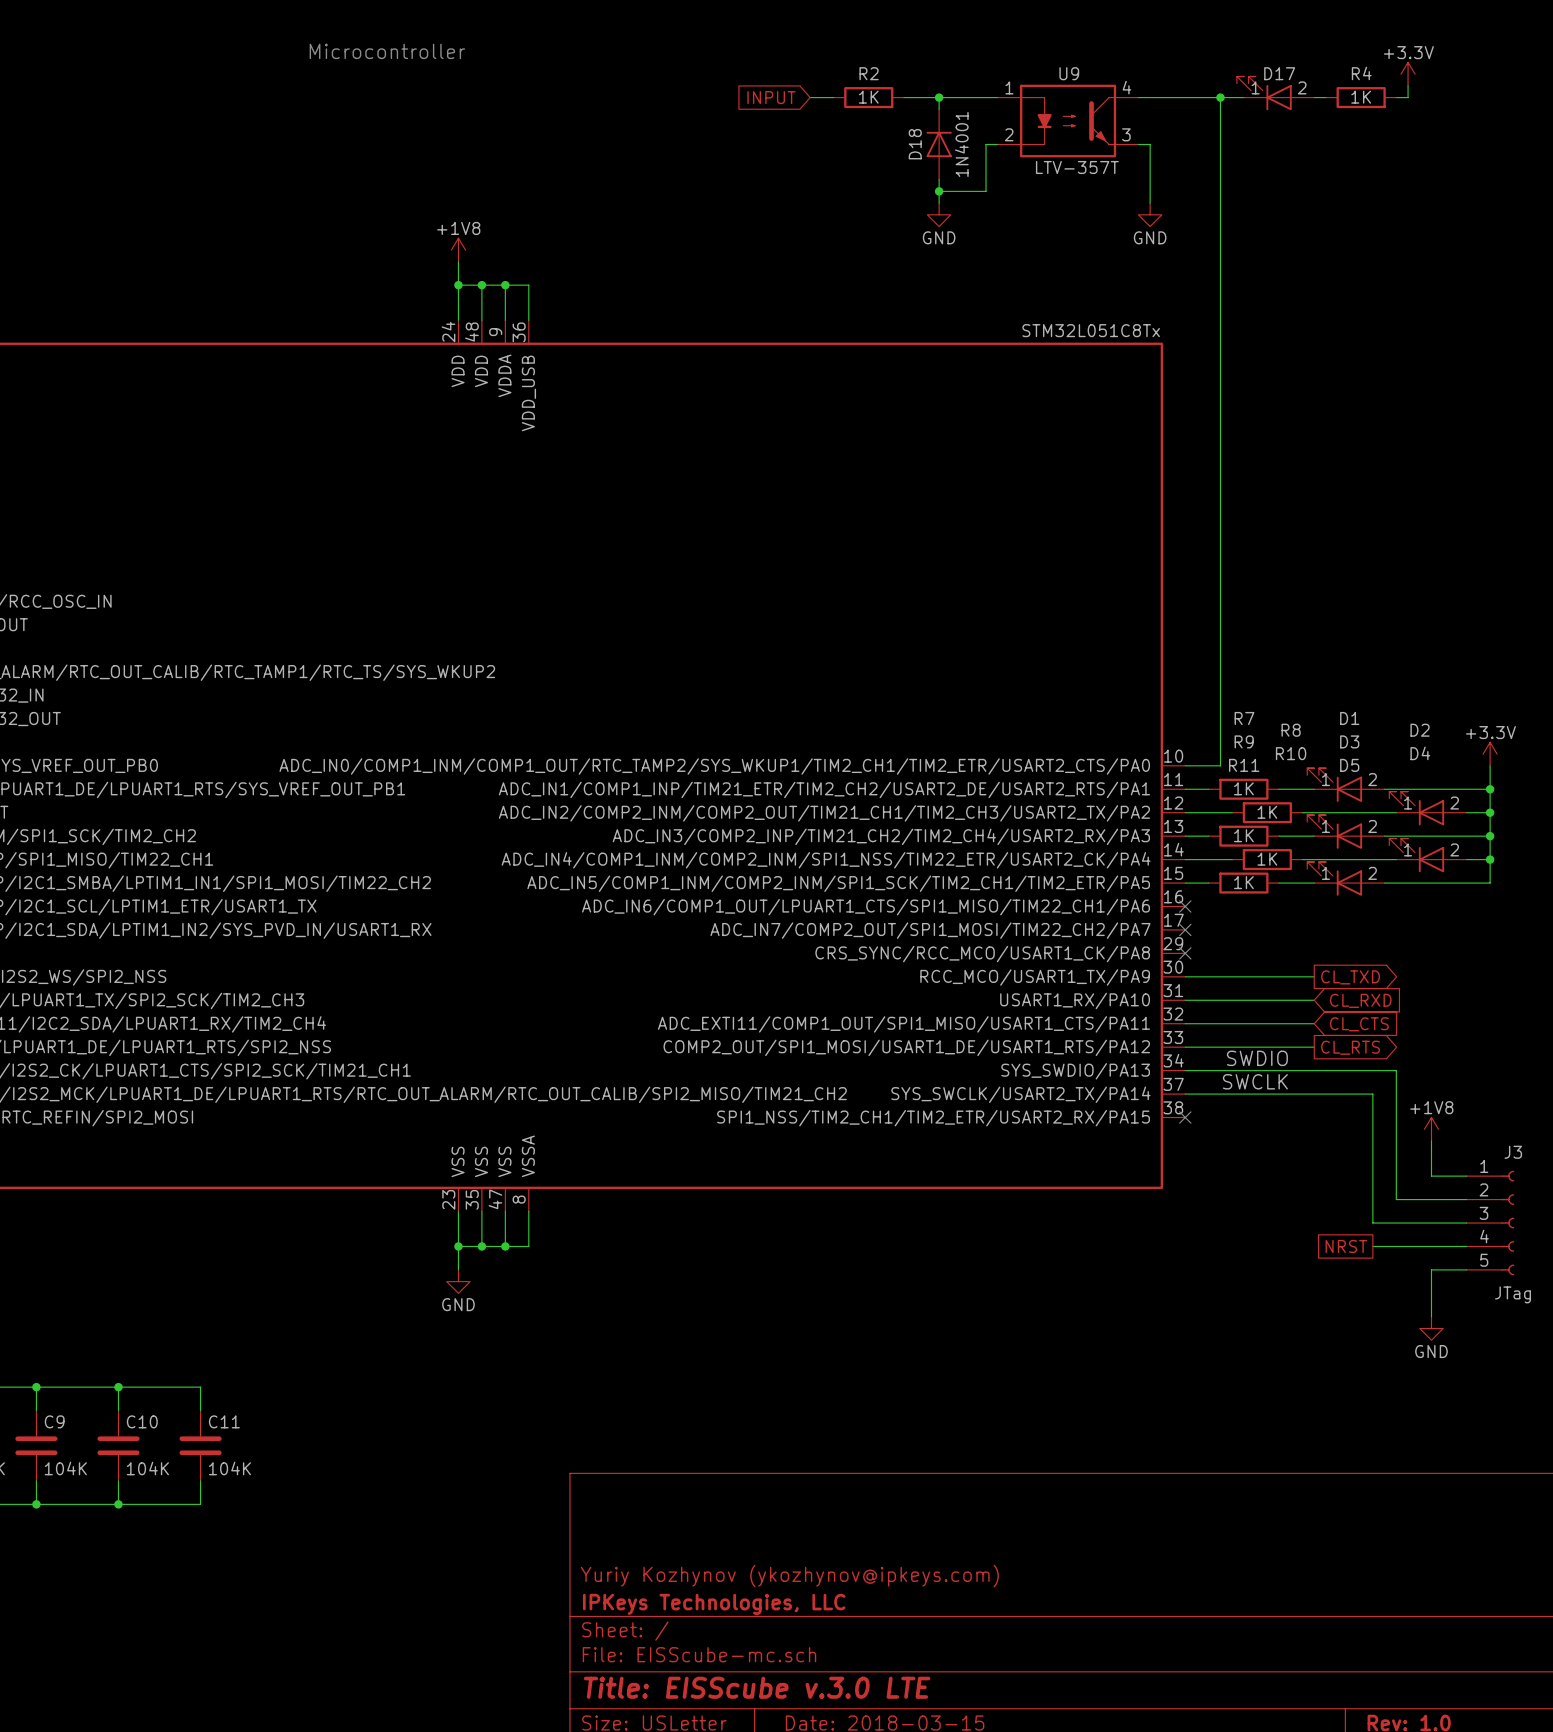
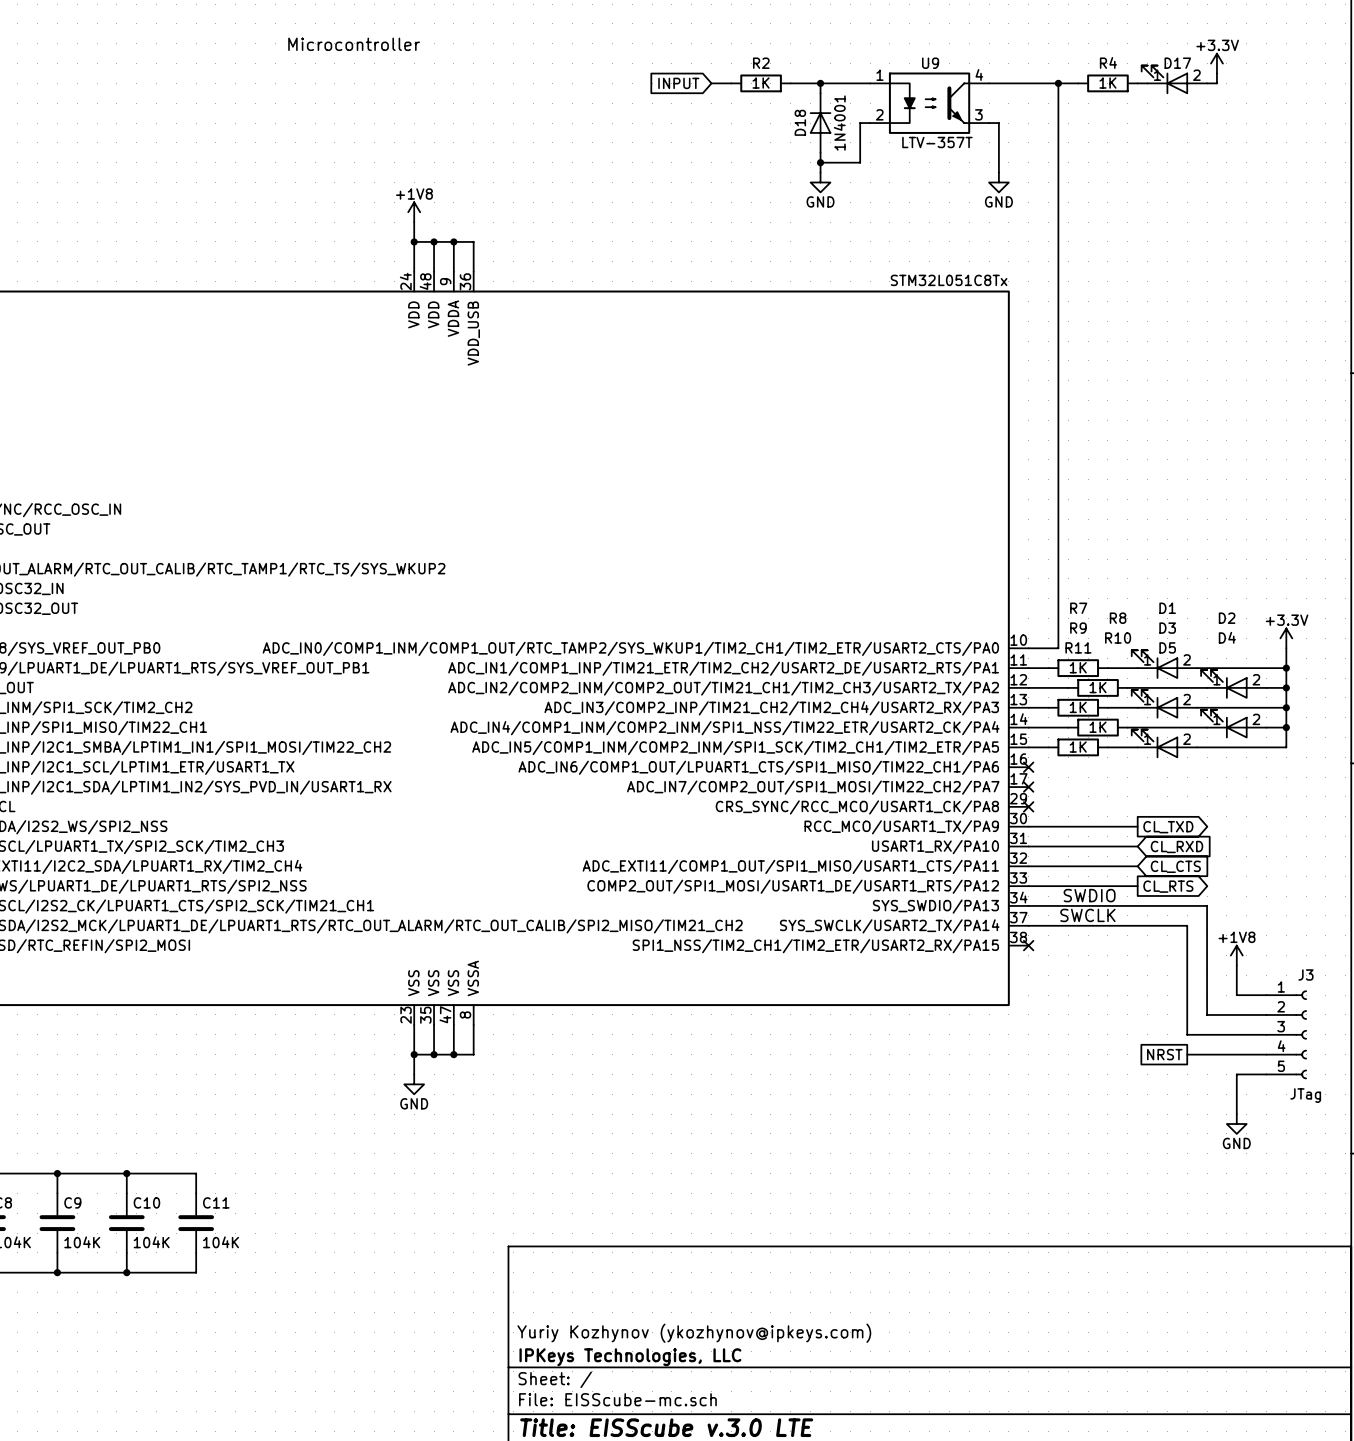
D17 position: (1275, 93) -> (1174, 79)
R4 position: (1361, 97) -> (1107, 83)

